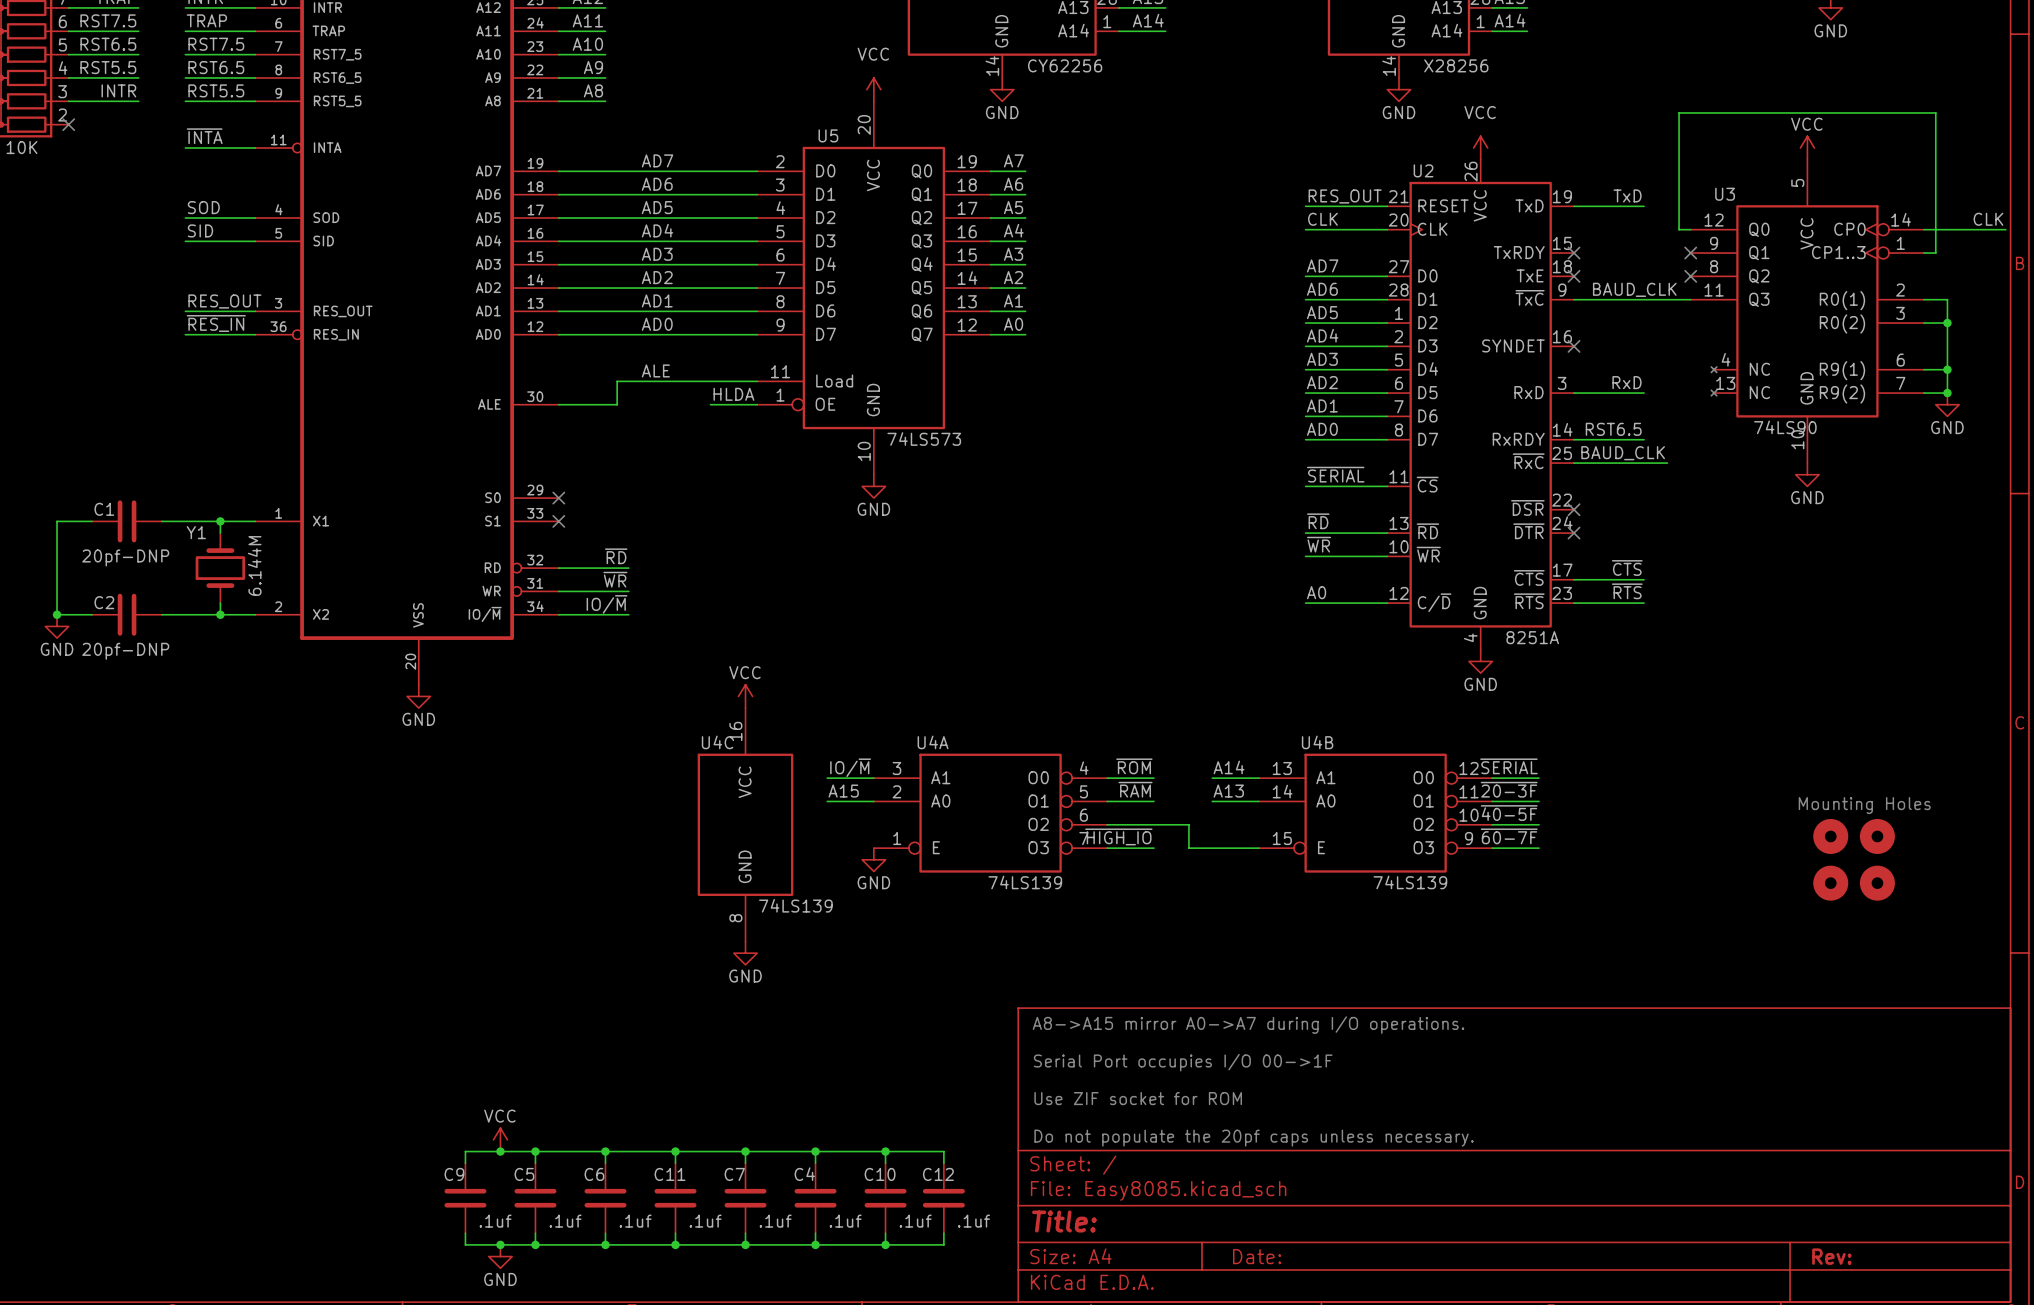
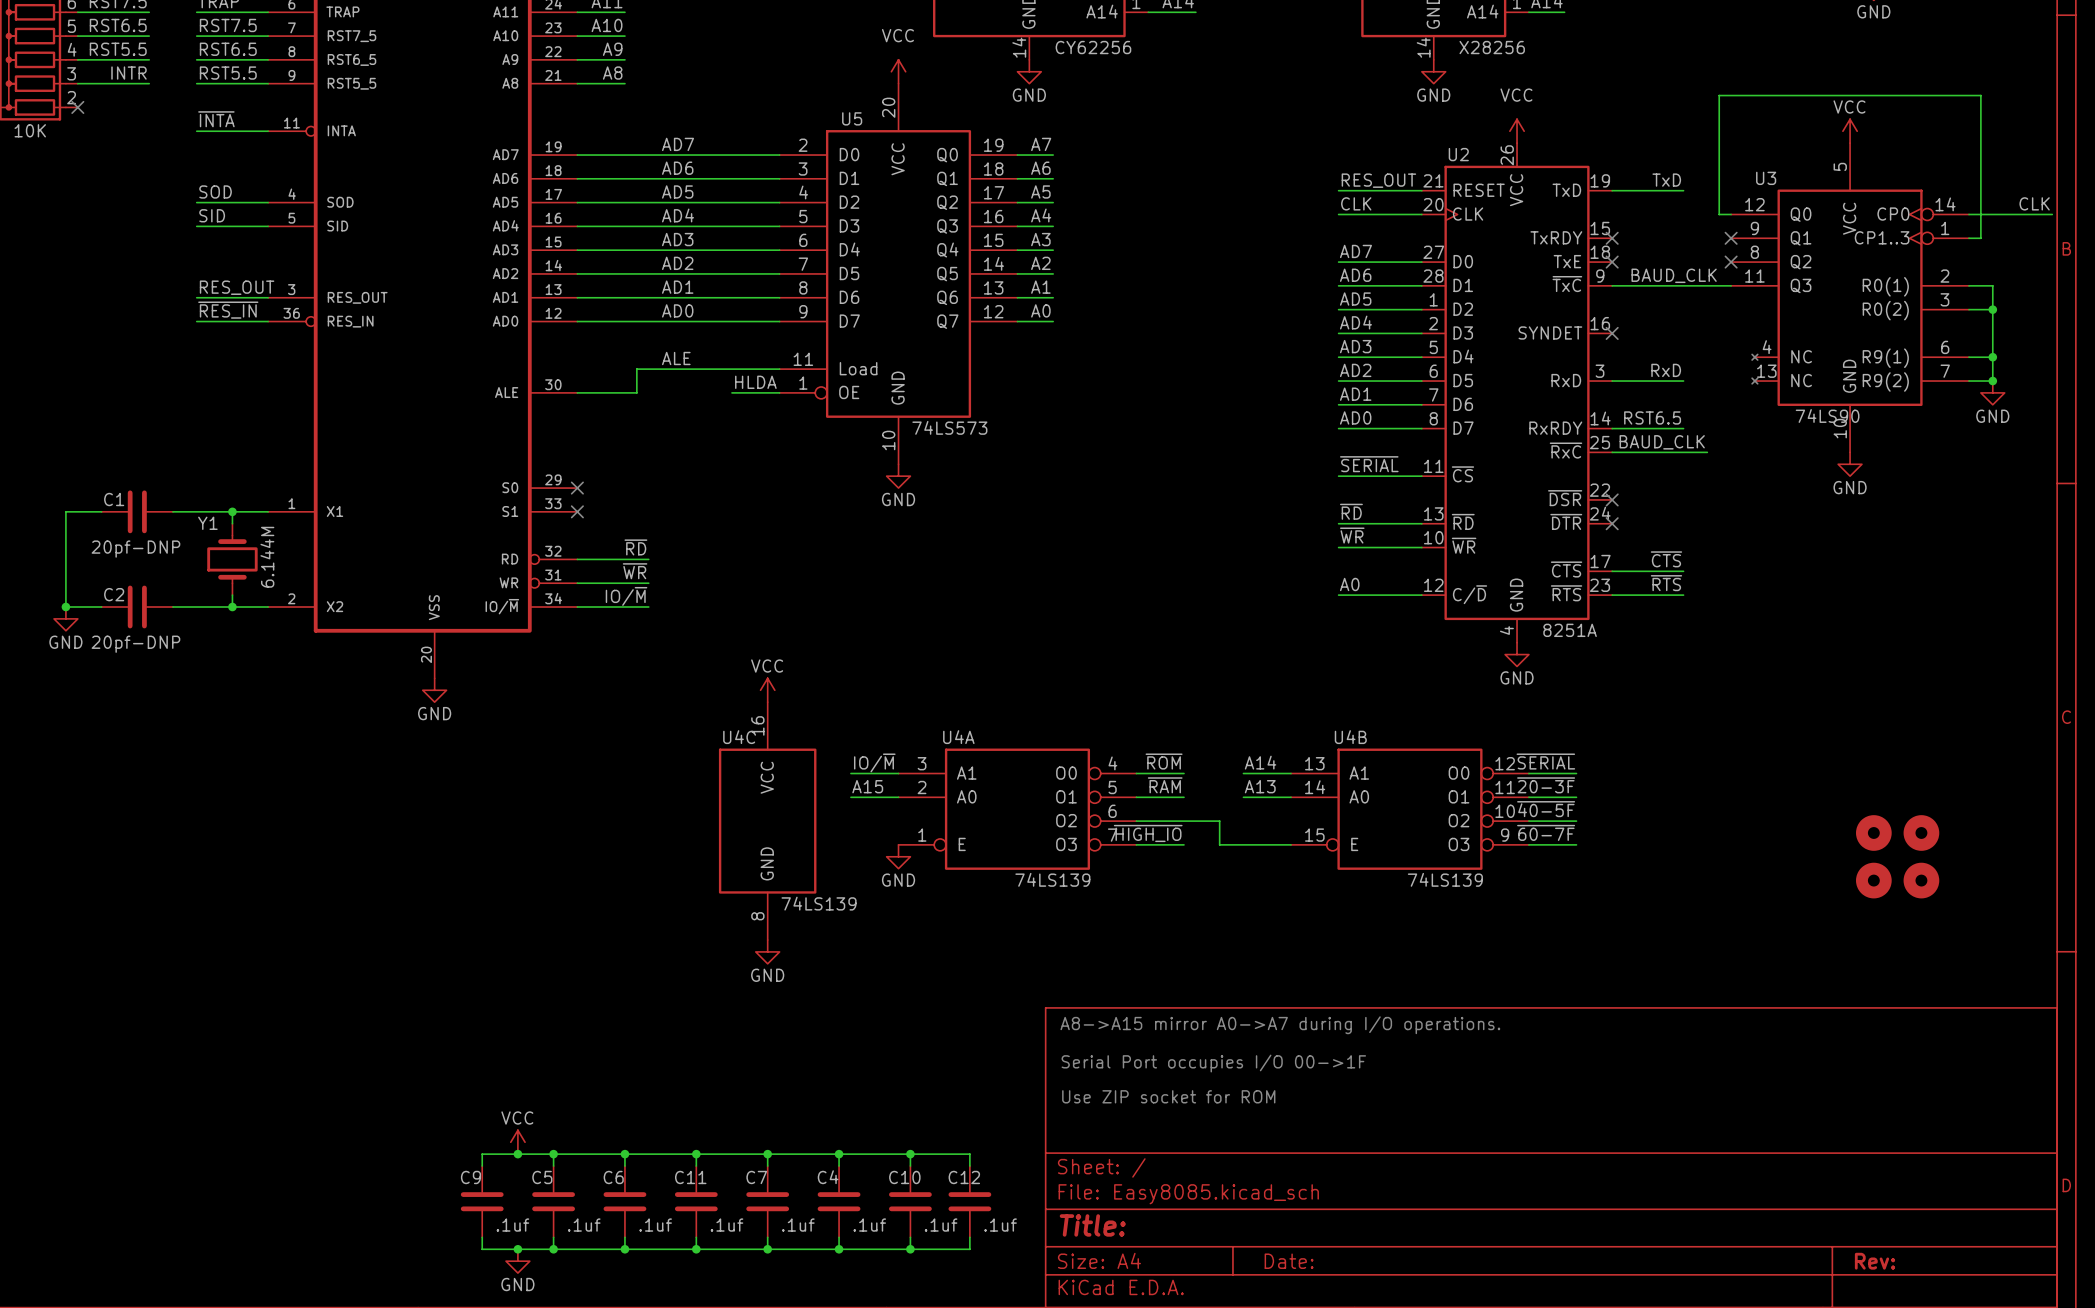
text: Mounting Holes (1864, 805) -> none
text: Use ZIF socket for ROM (1138, 1098) -> Use ZIP socket for ROM (1168, 1096)
text: Do not populate the 20pf caps unless necessary. (1254, 1138) -> none

